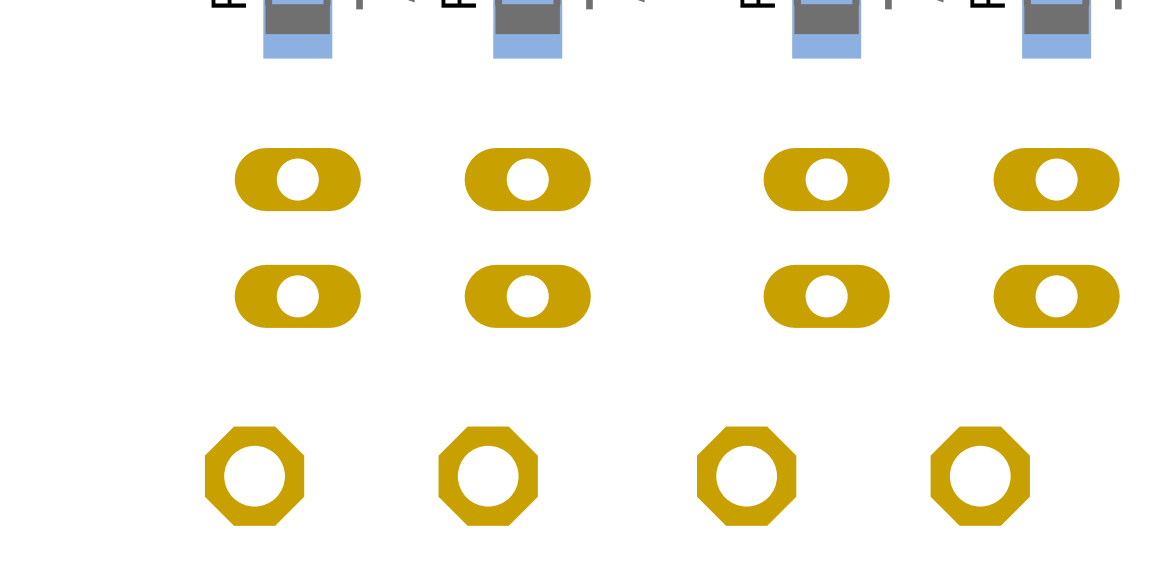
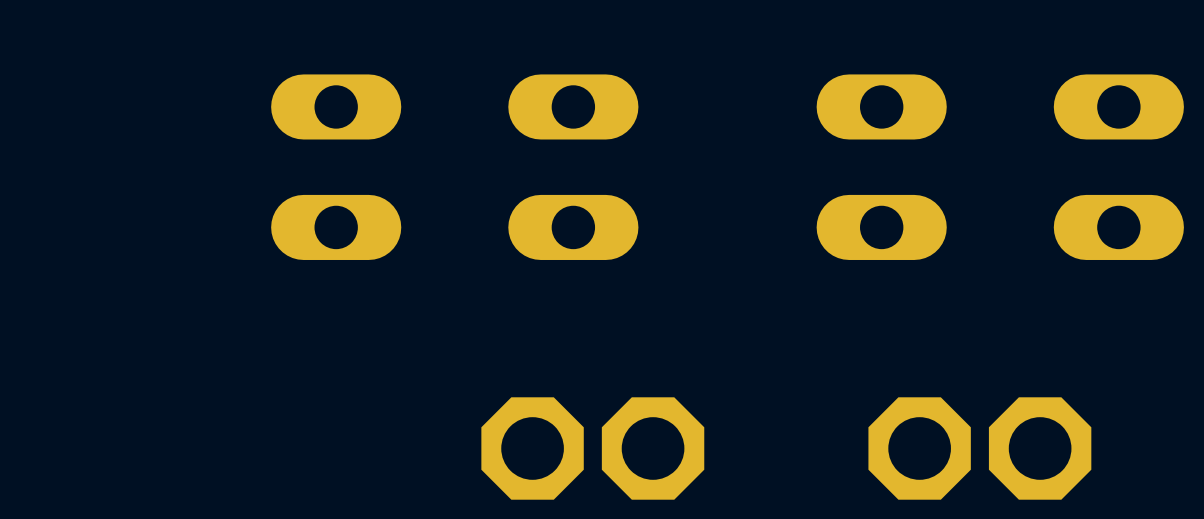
part: (254, 476) -> none
part position: (488, 476) -> (532, 448)
part: (746, 476) -> none
part position: (980, 476) -> (1040, 448)
part: none -> (653, 448)
part: none -> (919, 448)

